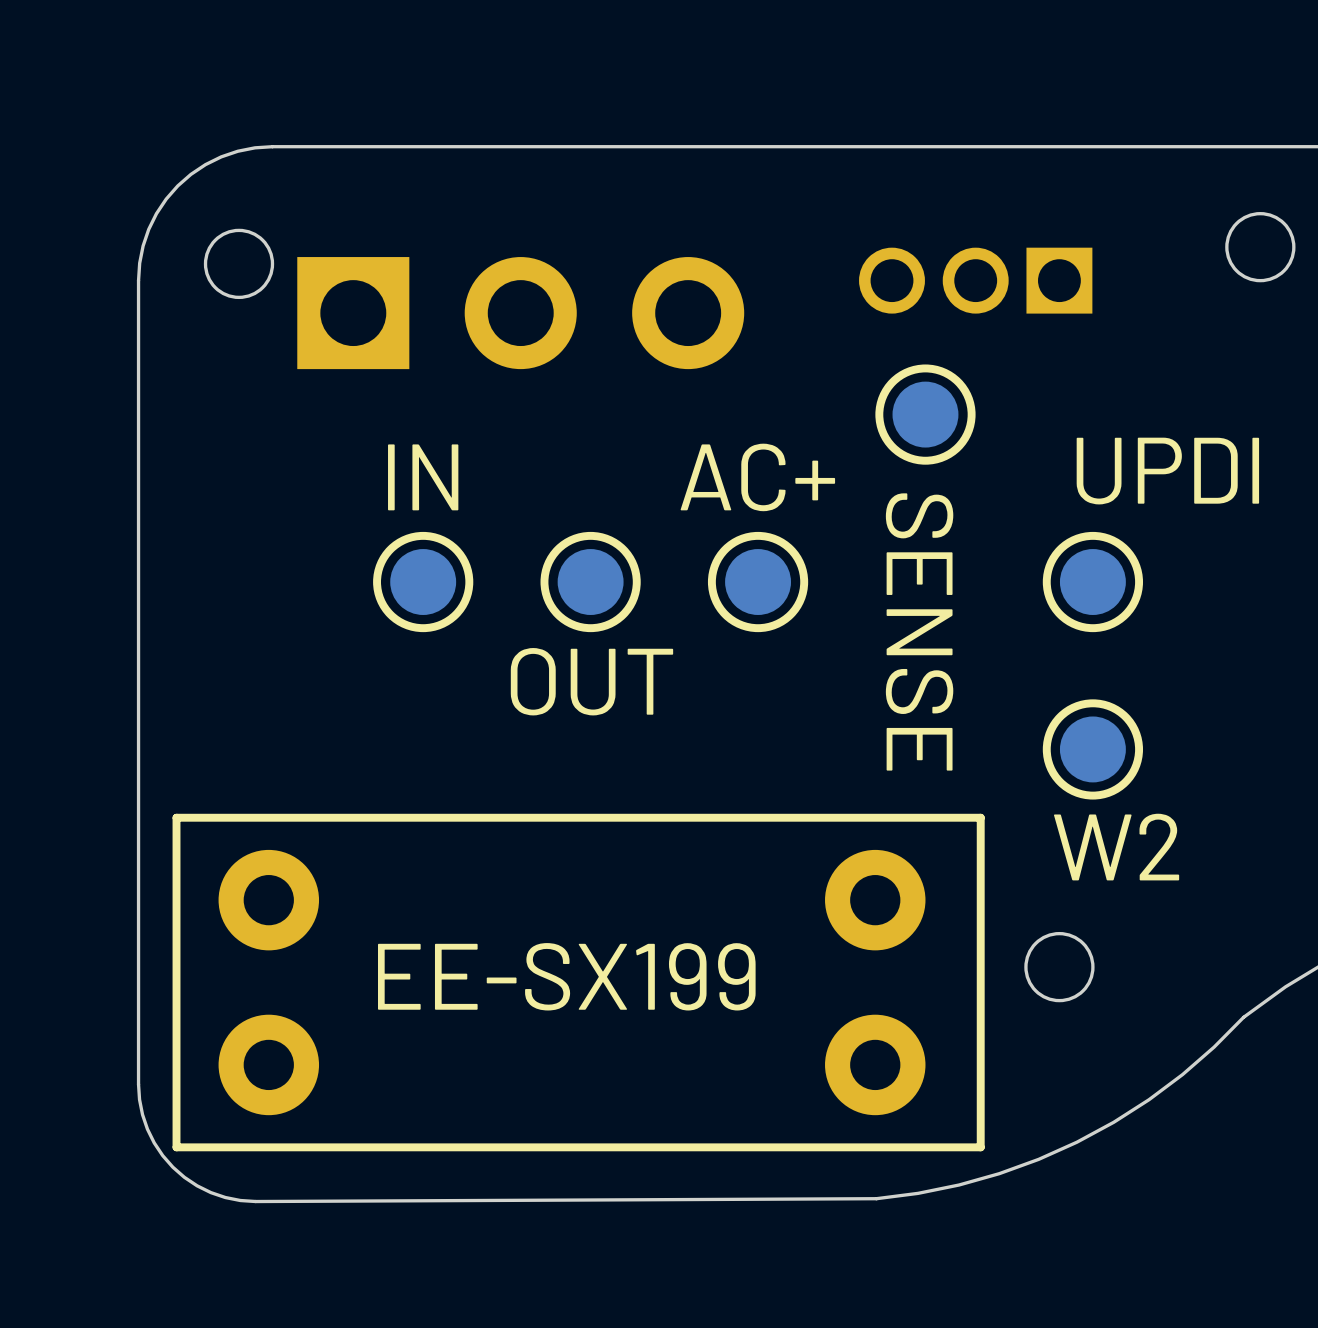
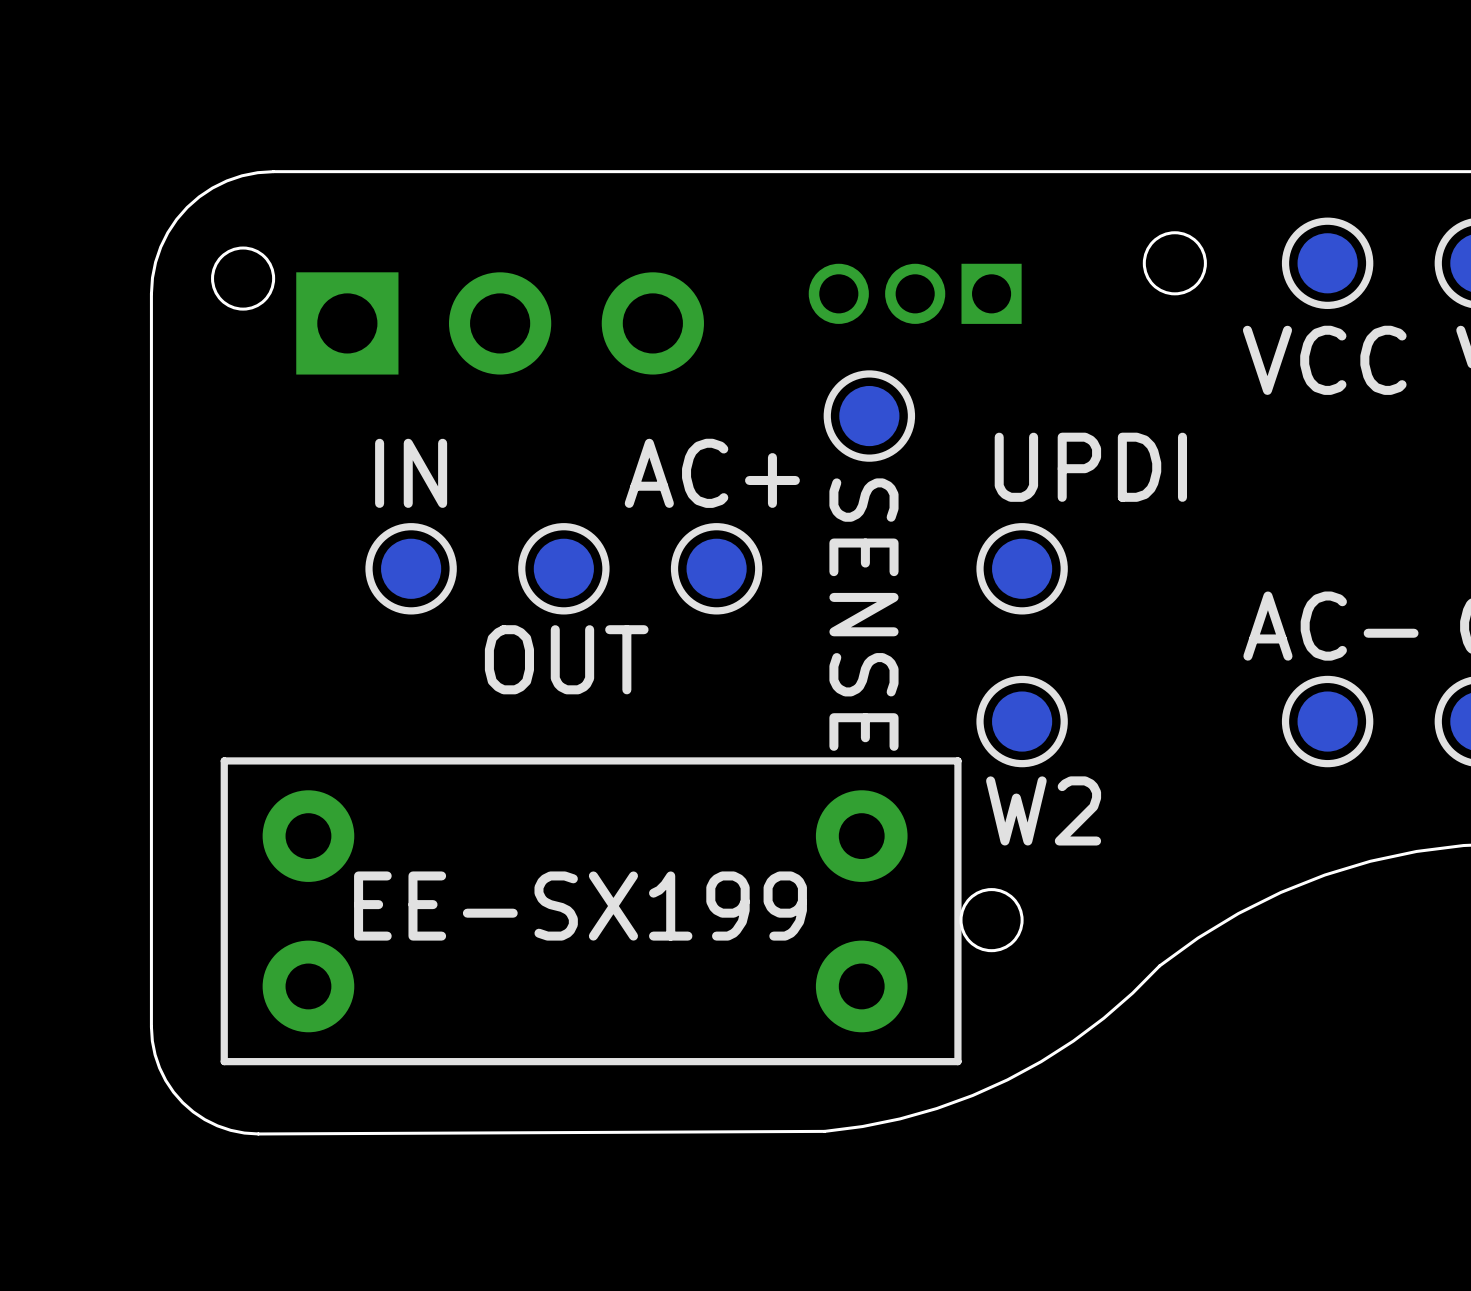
part position: (578, 982) -> (591, 911)

